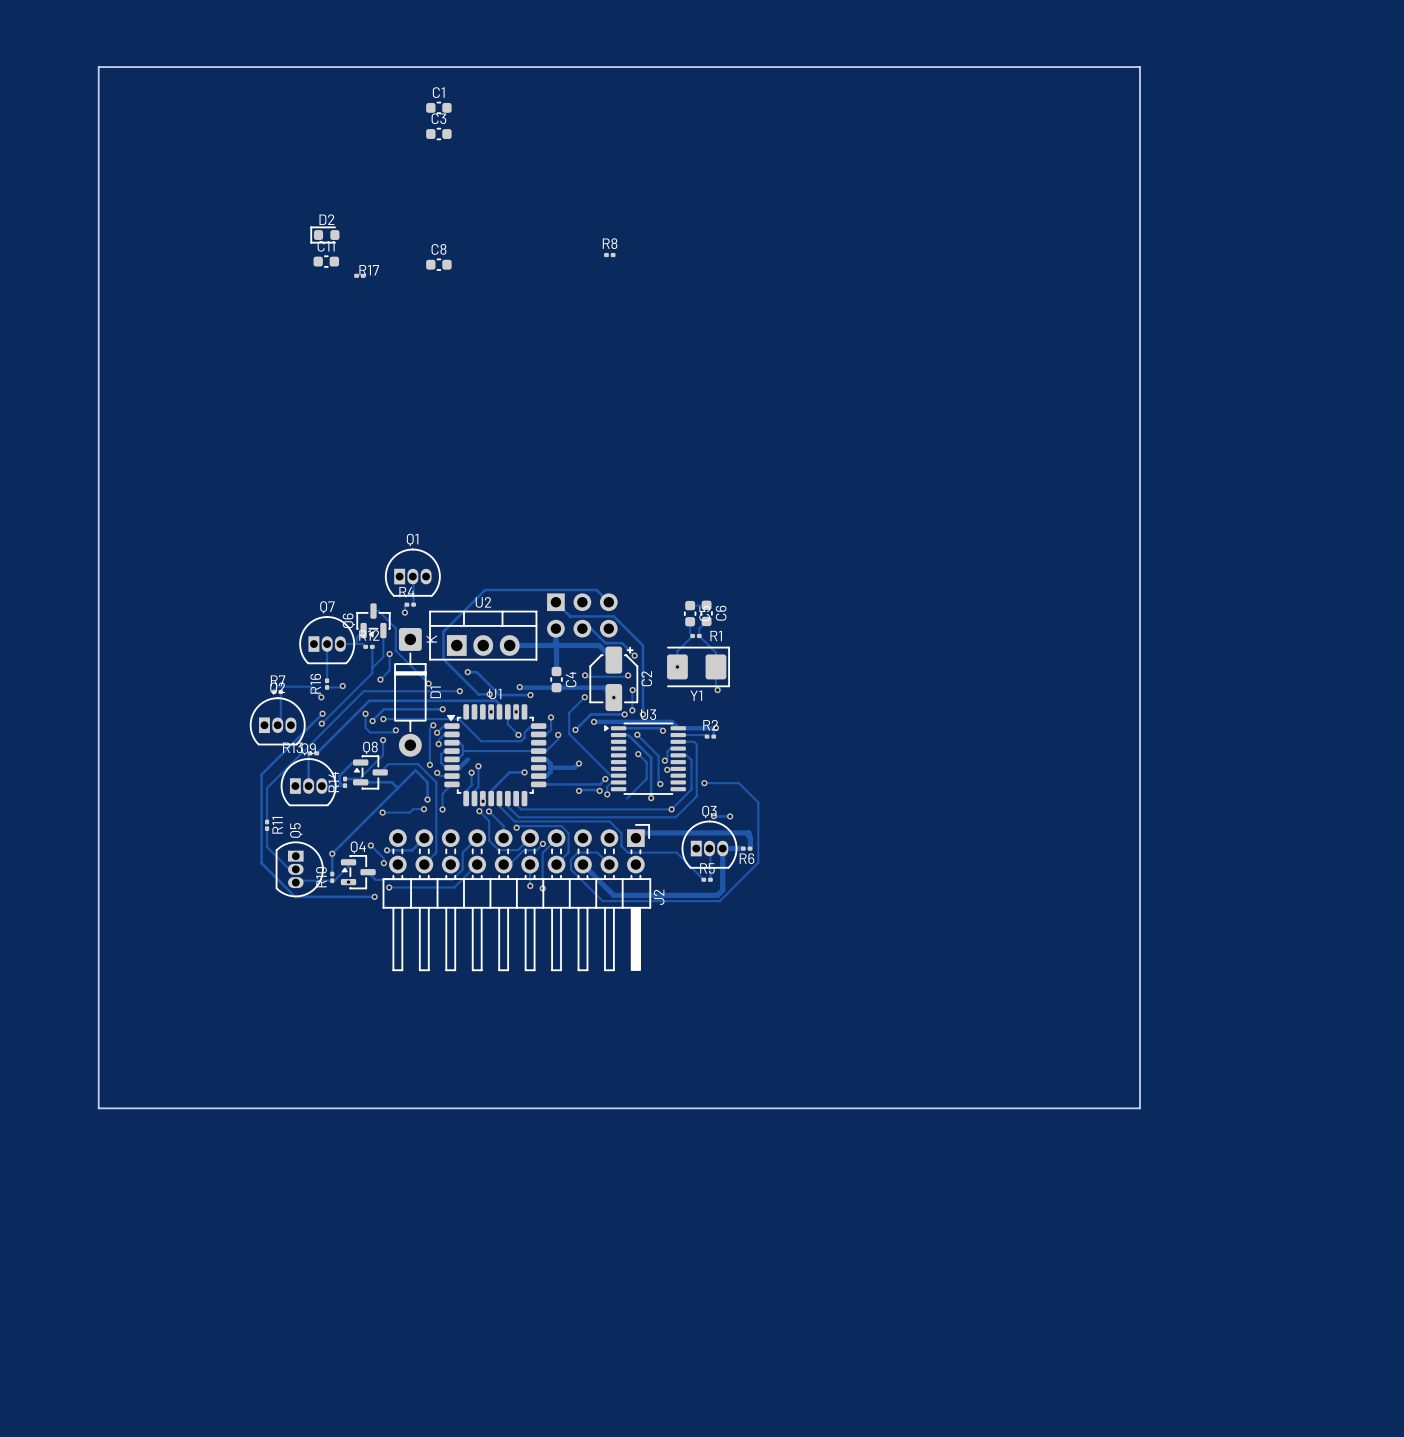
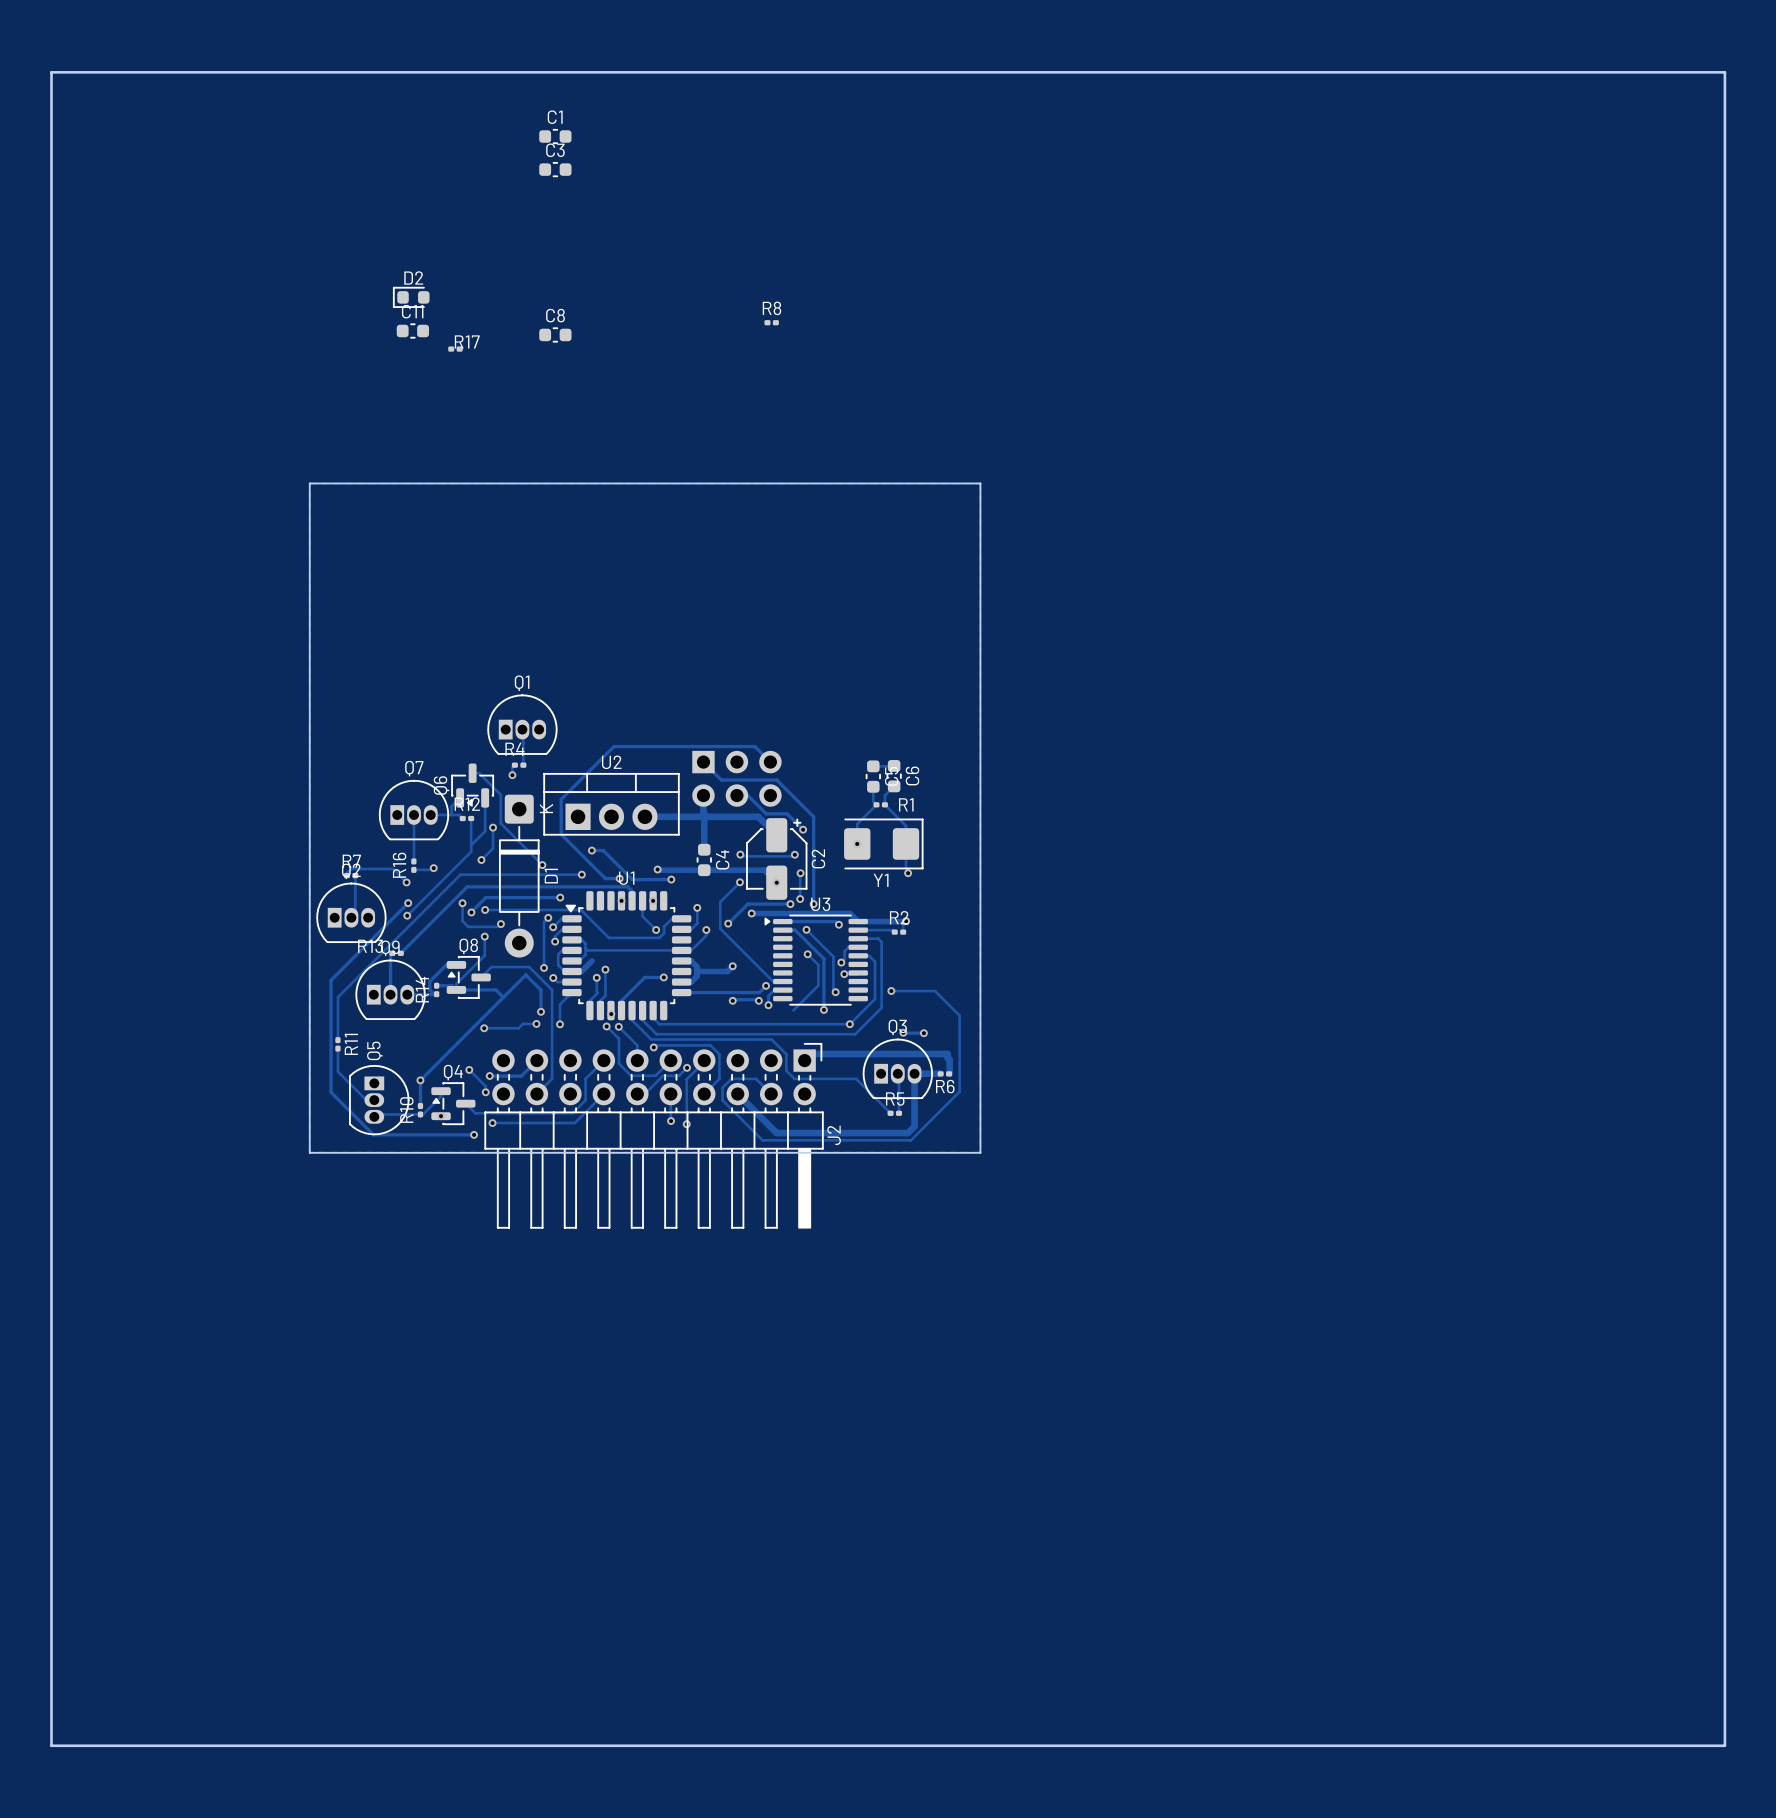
board edge: (98, 67) (1139, 67) (1139, 1108) (98, 1108) (98, 67) -> (51, 72) (51, 1745) (1724, 1745) (1724, 72) (51, 72)
board edge: none -> (309, 483) (980, 483) (980, 1152) (309, 1152) (309, 483)

